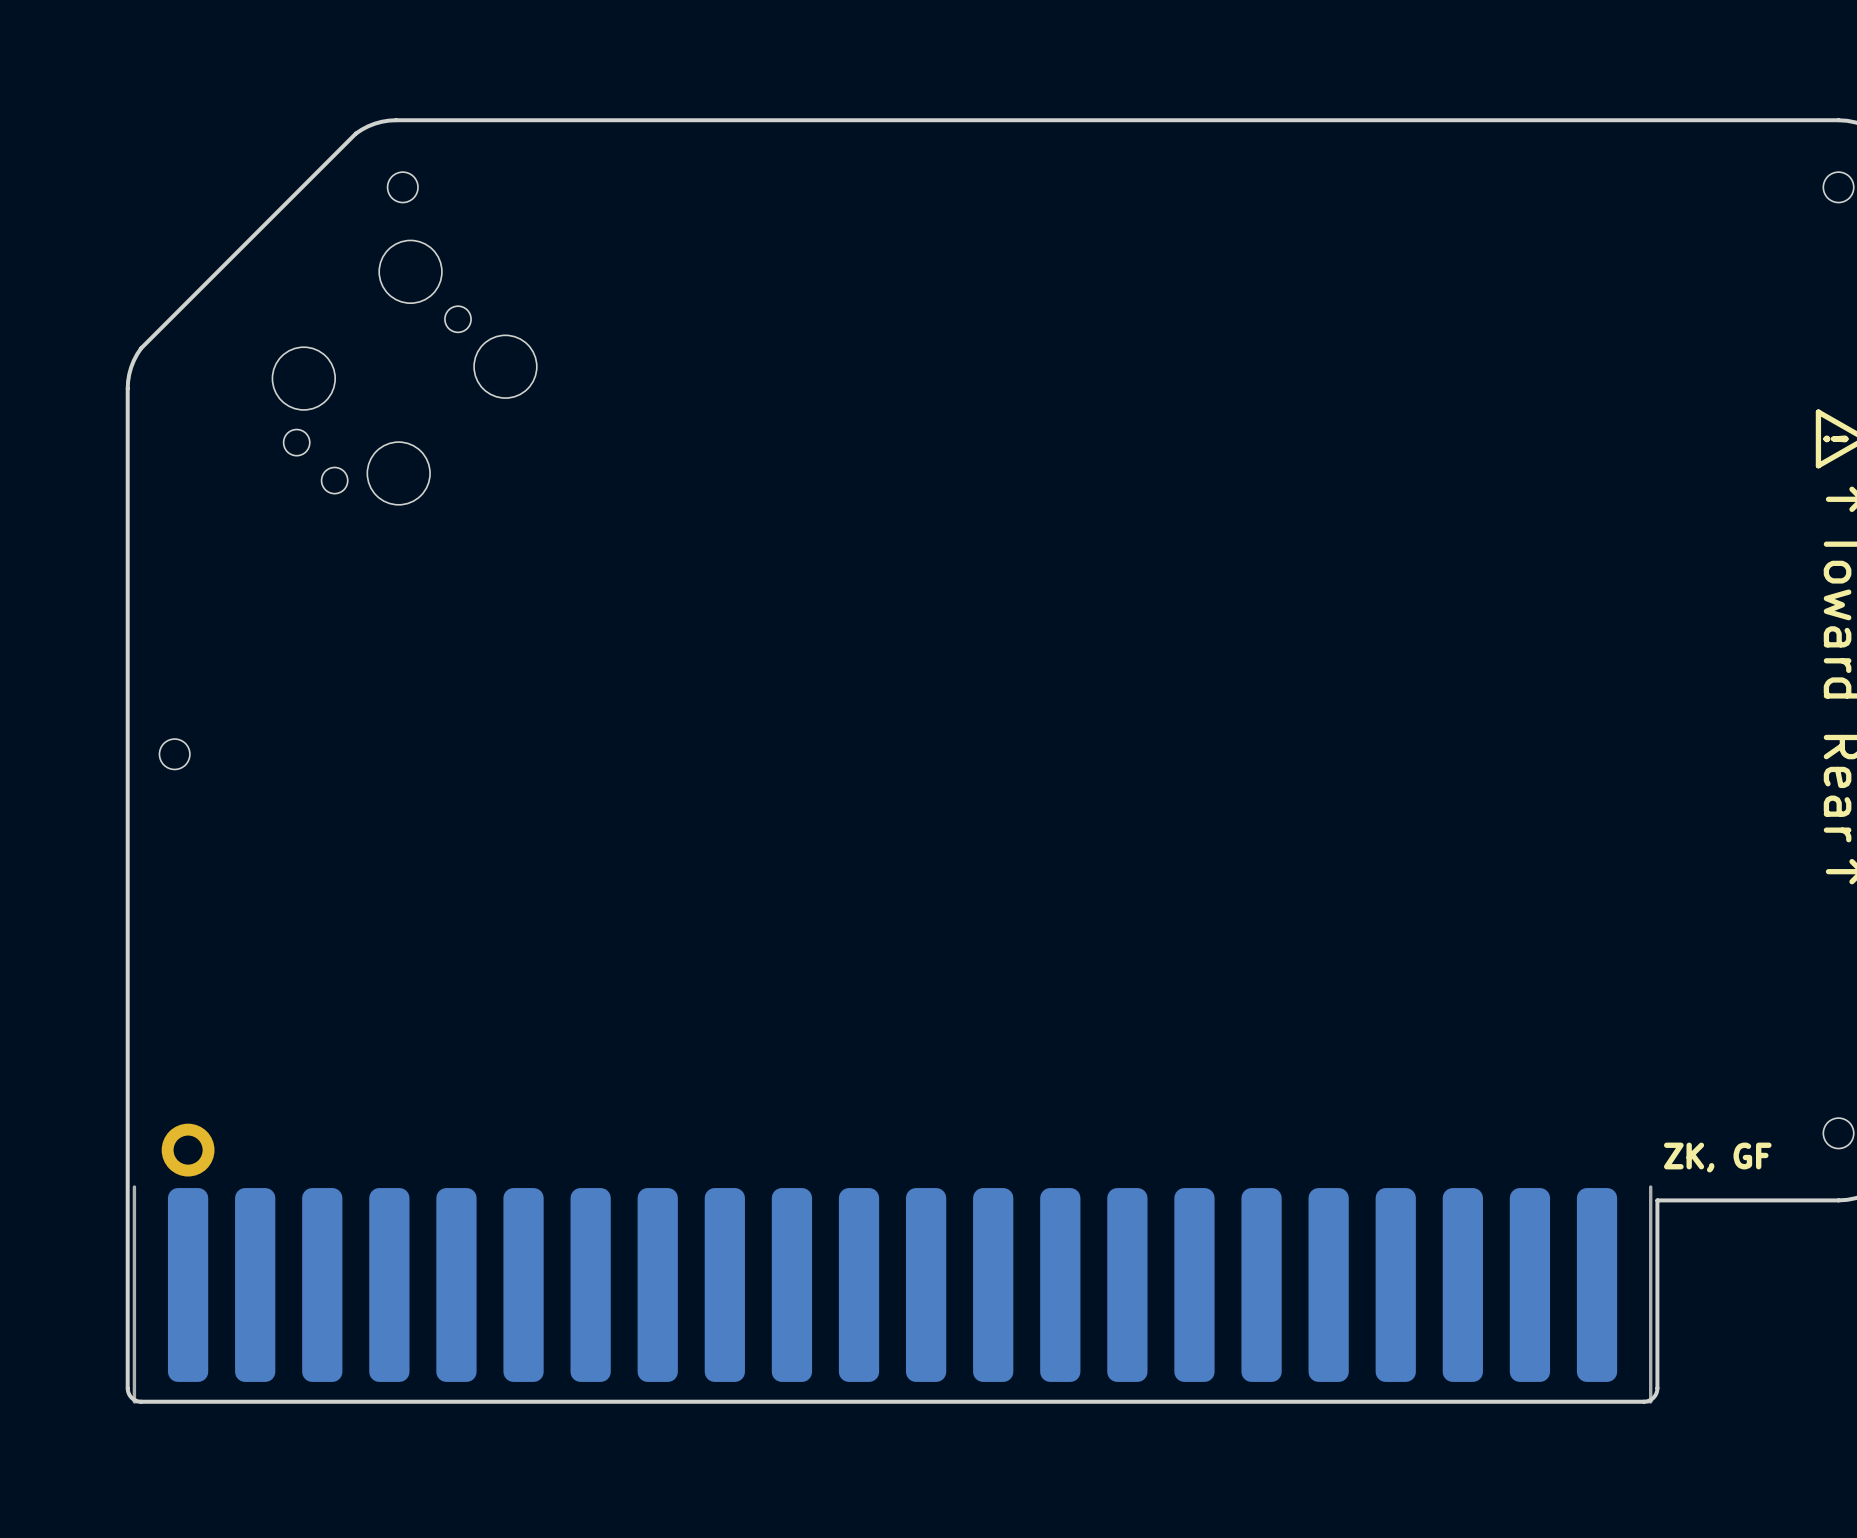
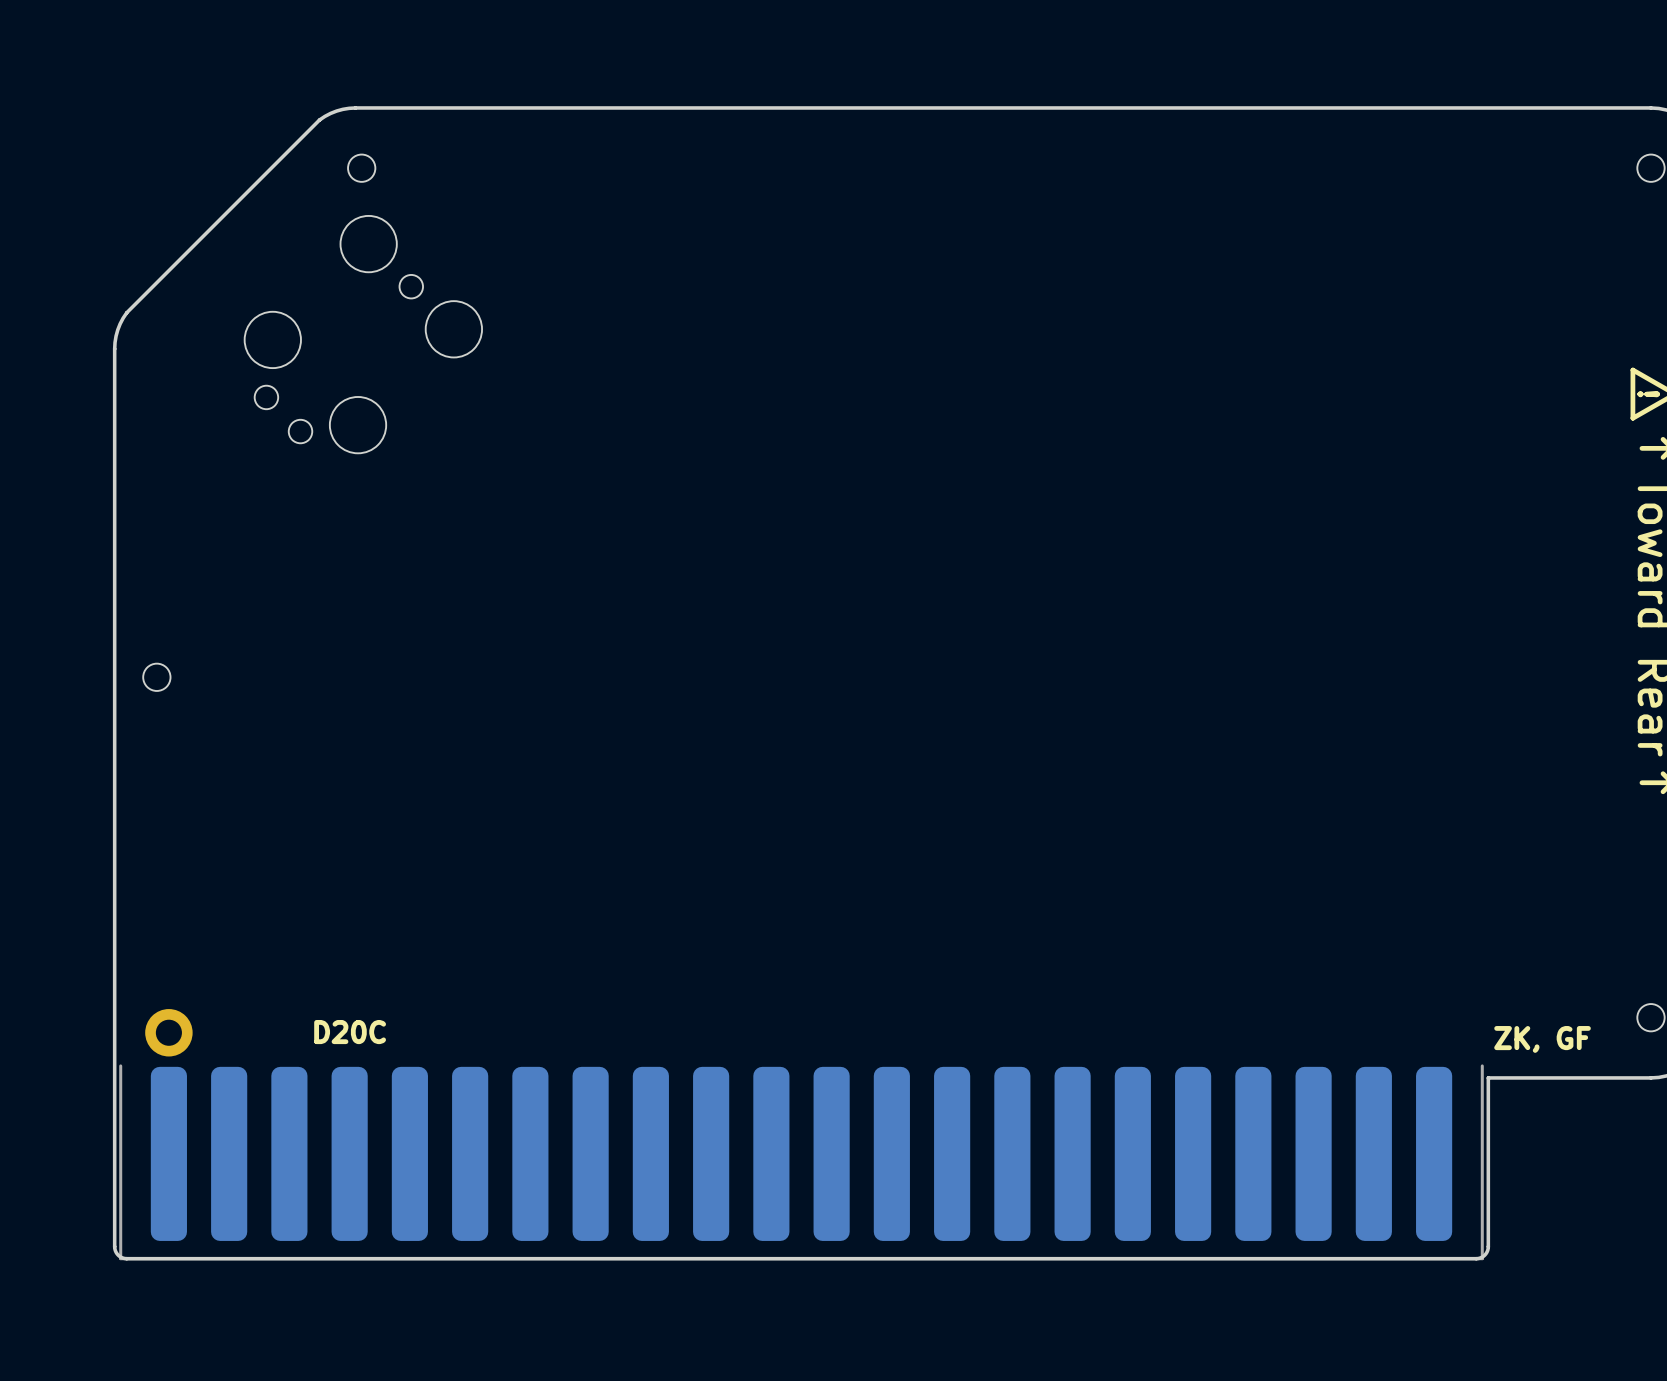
text: none -> D20C (350, 1032)

